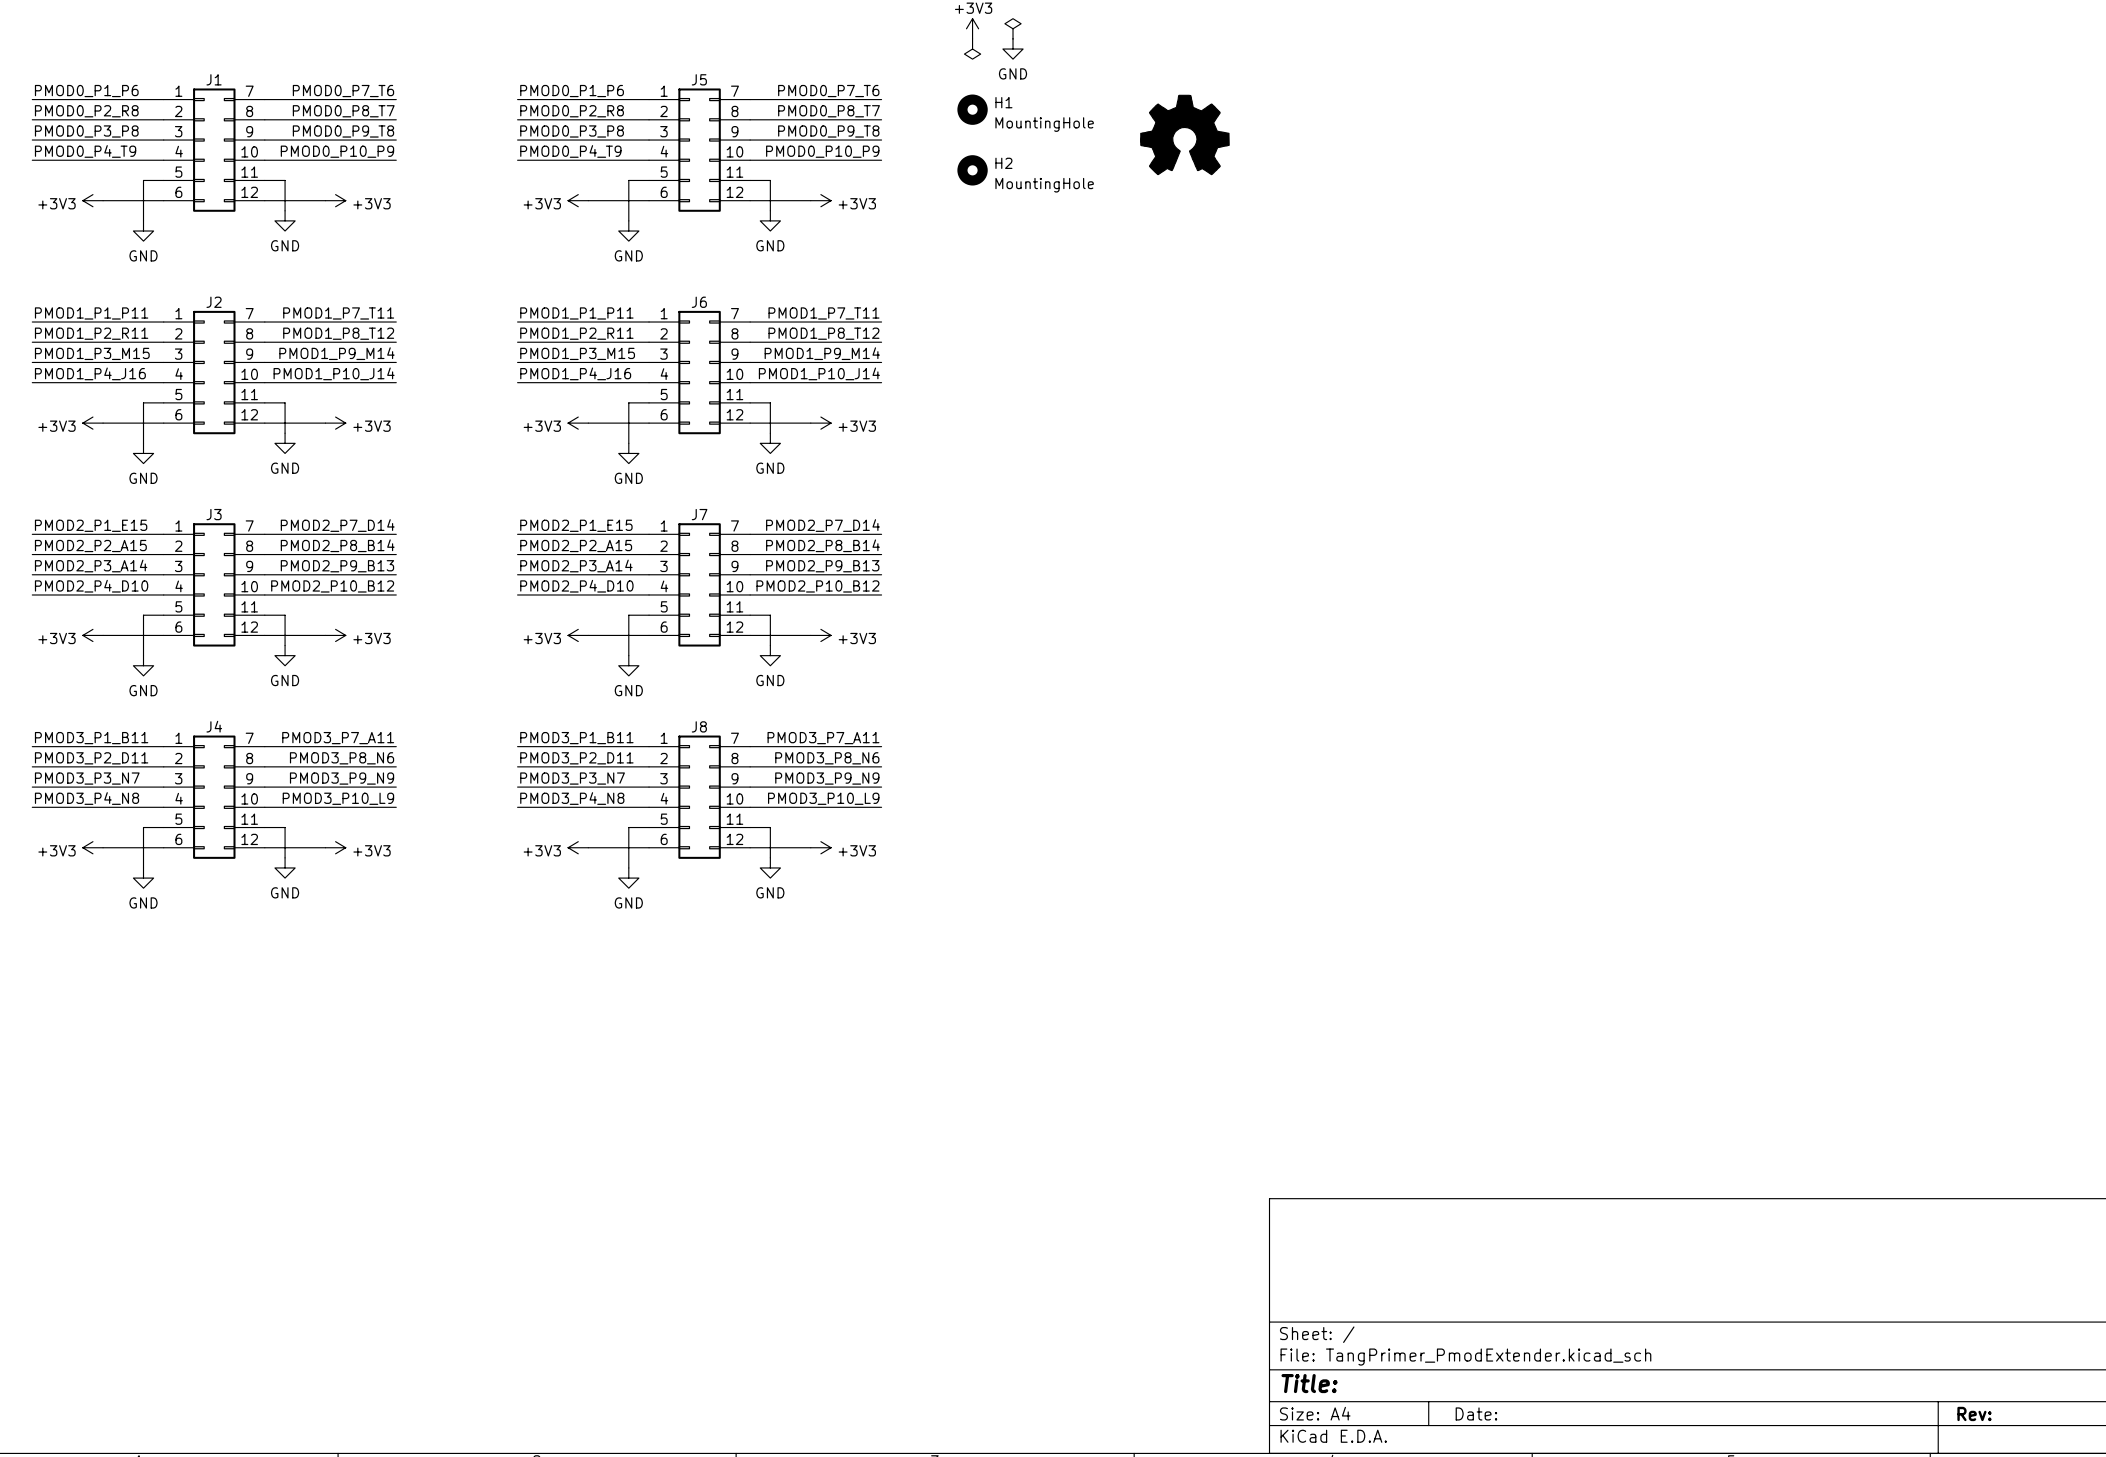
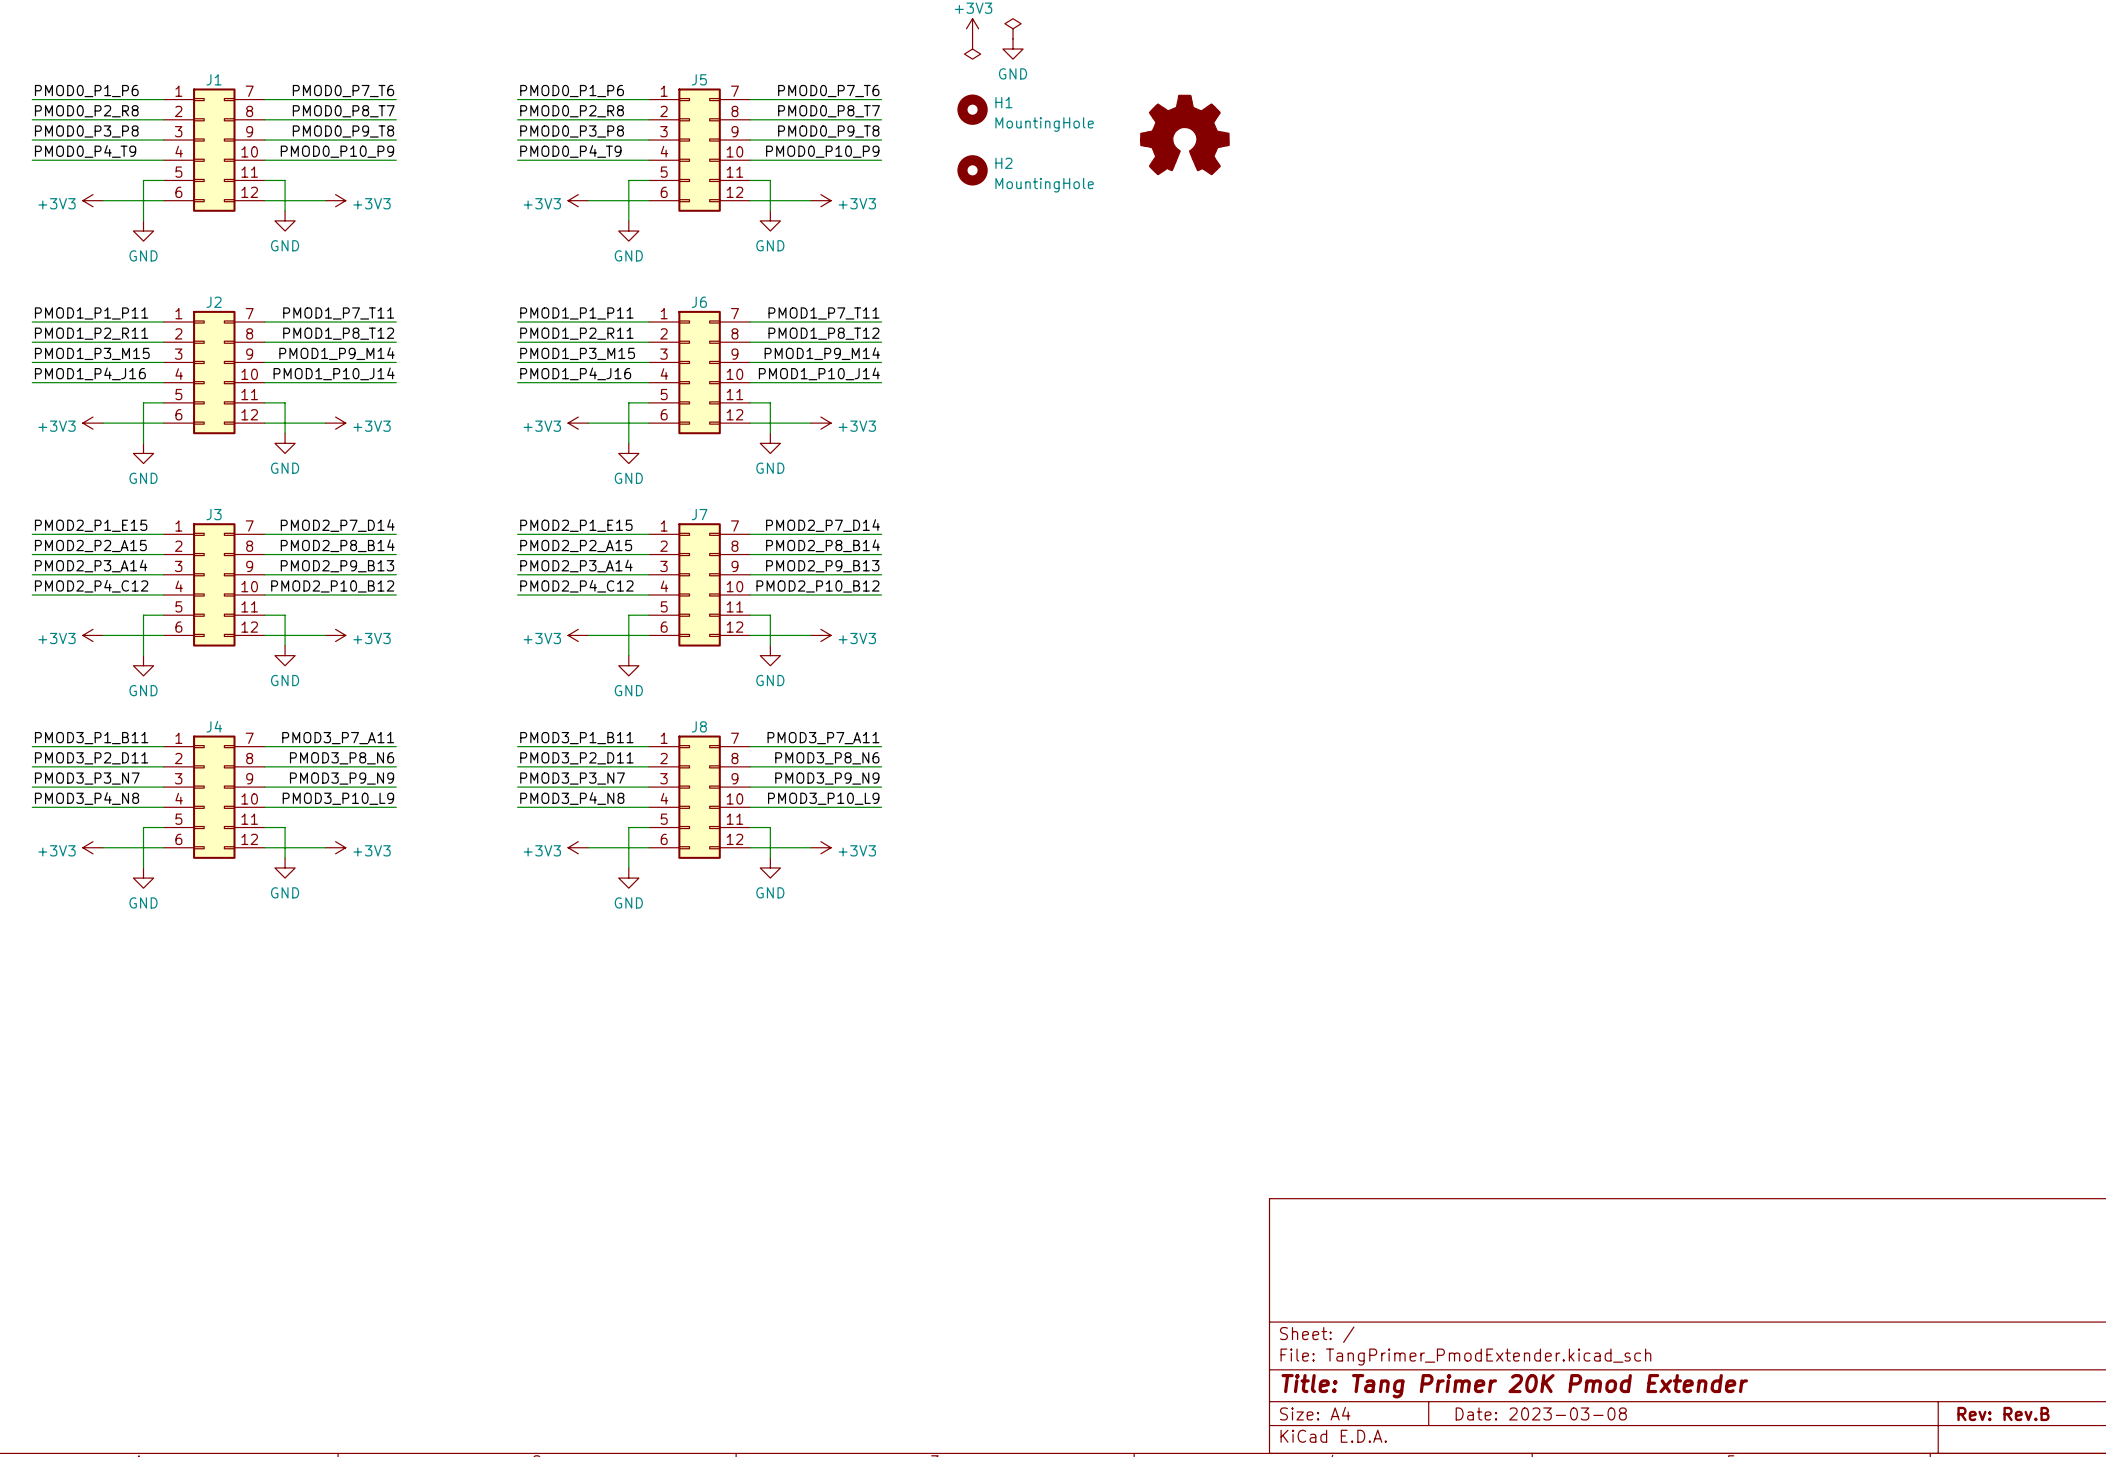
label: PMOD2_P4_D10 (91, 586) -> PMOD2_P4_C12 (91, 586)
label: PMOD2_P4_D10 (576, 586) -> PMOD2_P4_C12 (576, 586)
title block: Title: (1309, 1383) -> Title: Tang Primer 20K Pmod Extender (1514, 1386)
title block: Date: (1476, 1413) -> Date: 2023-03-08 (1541, 1413)
title block: Rev: (1974, 1413) -> Rev: Rev.B (2003, 1413)

